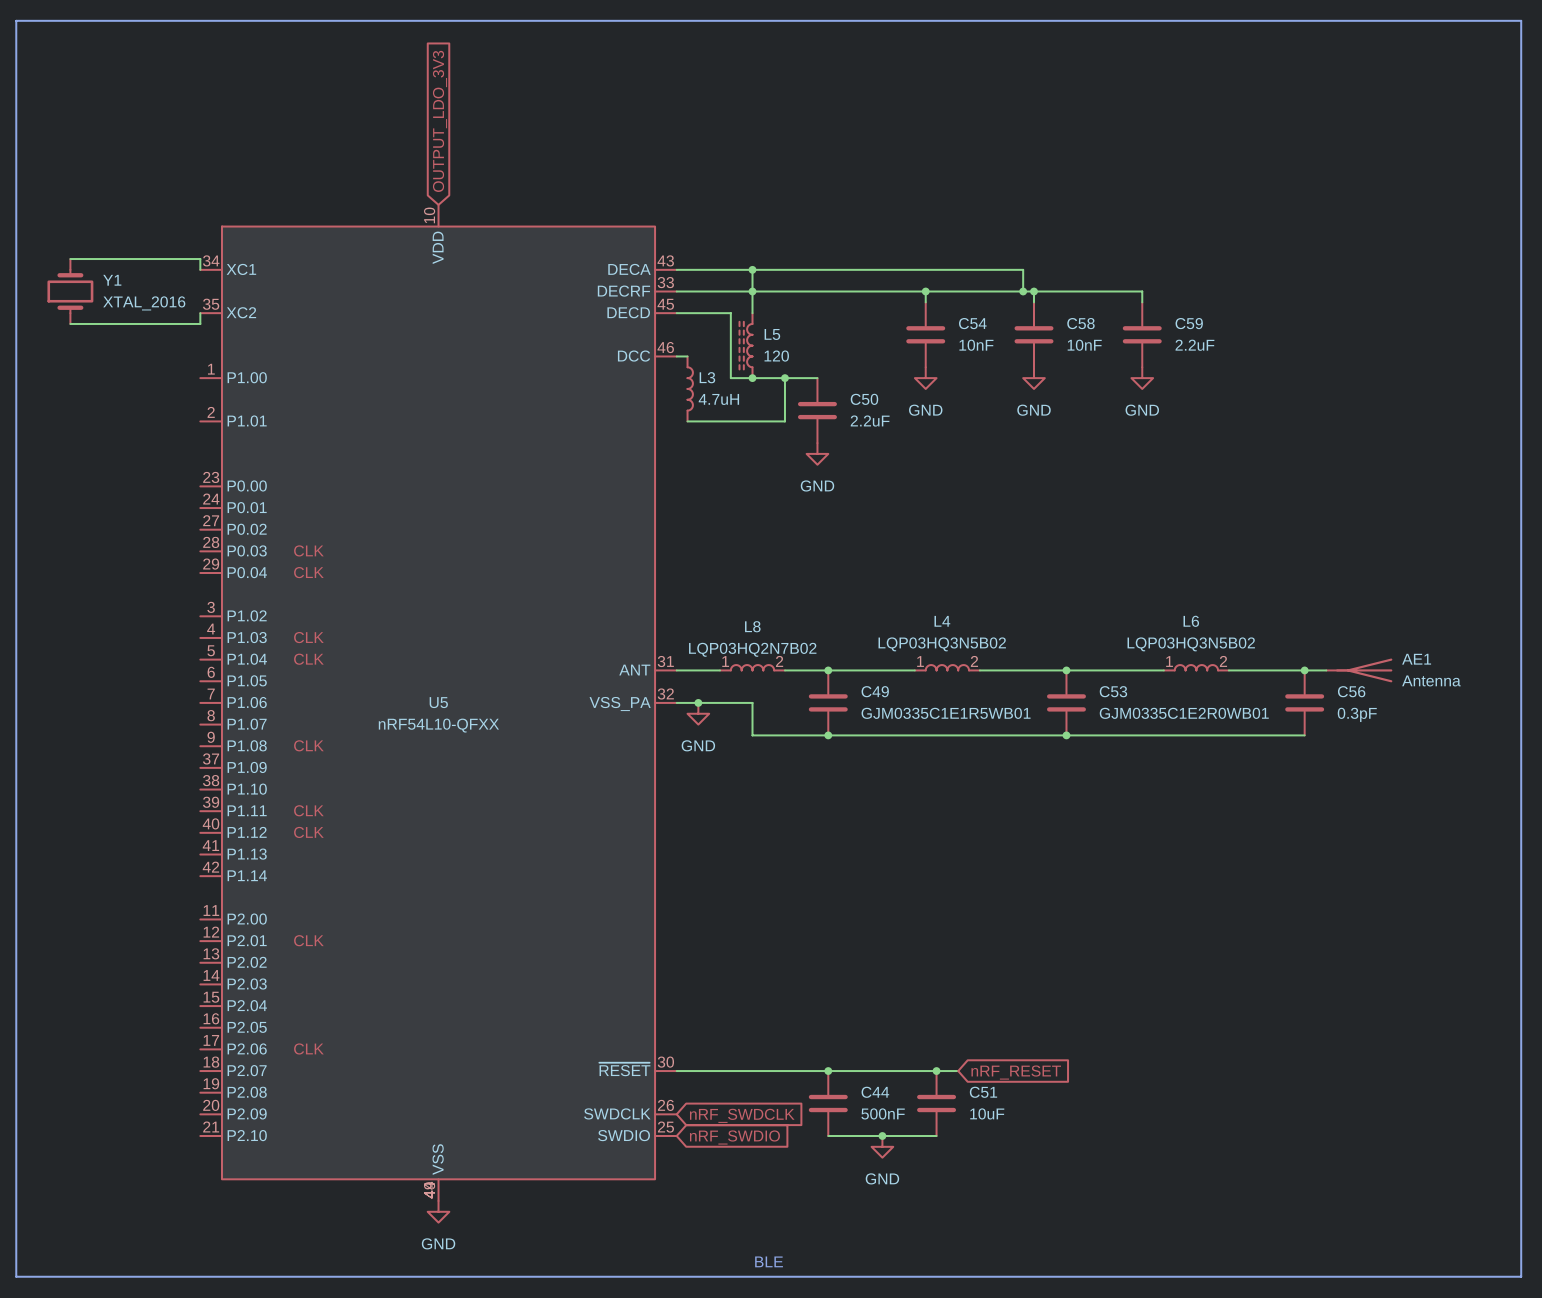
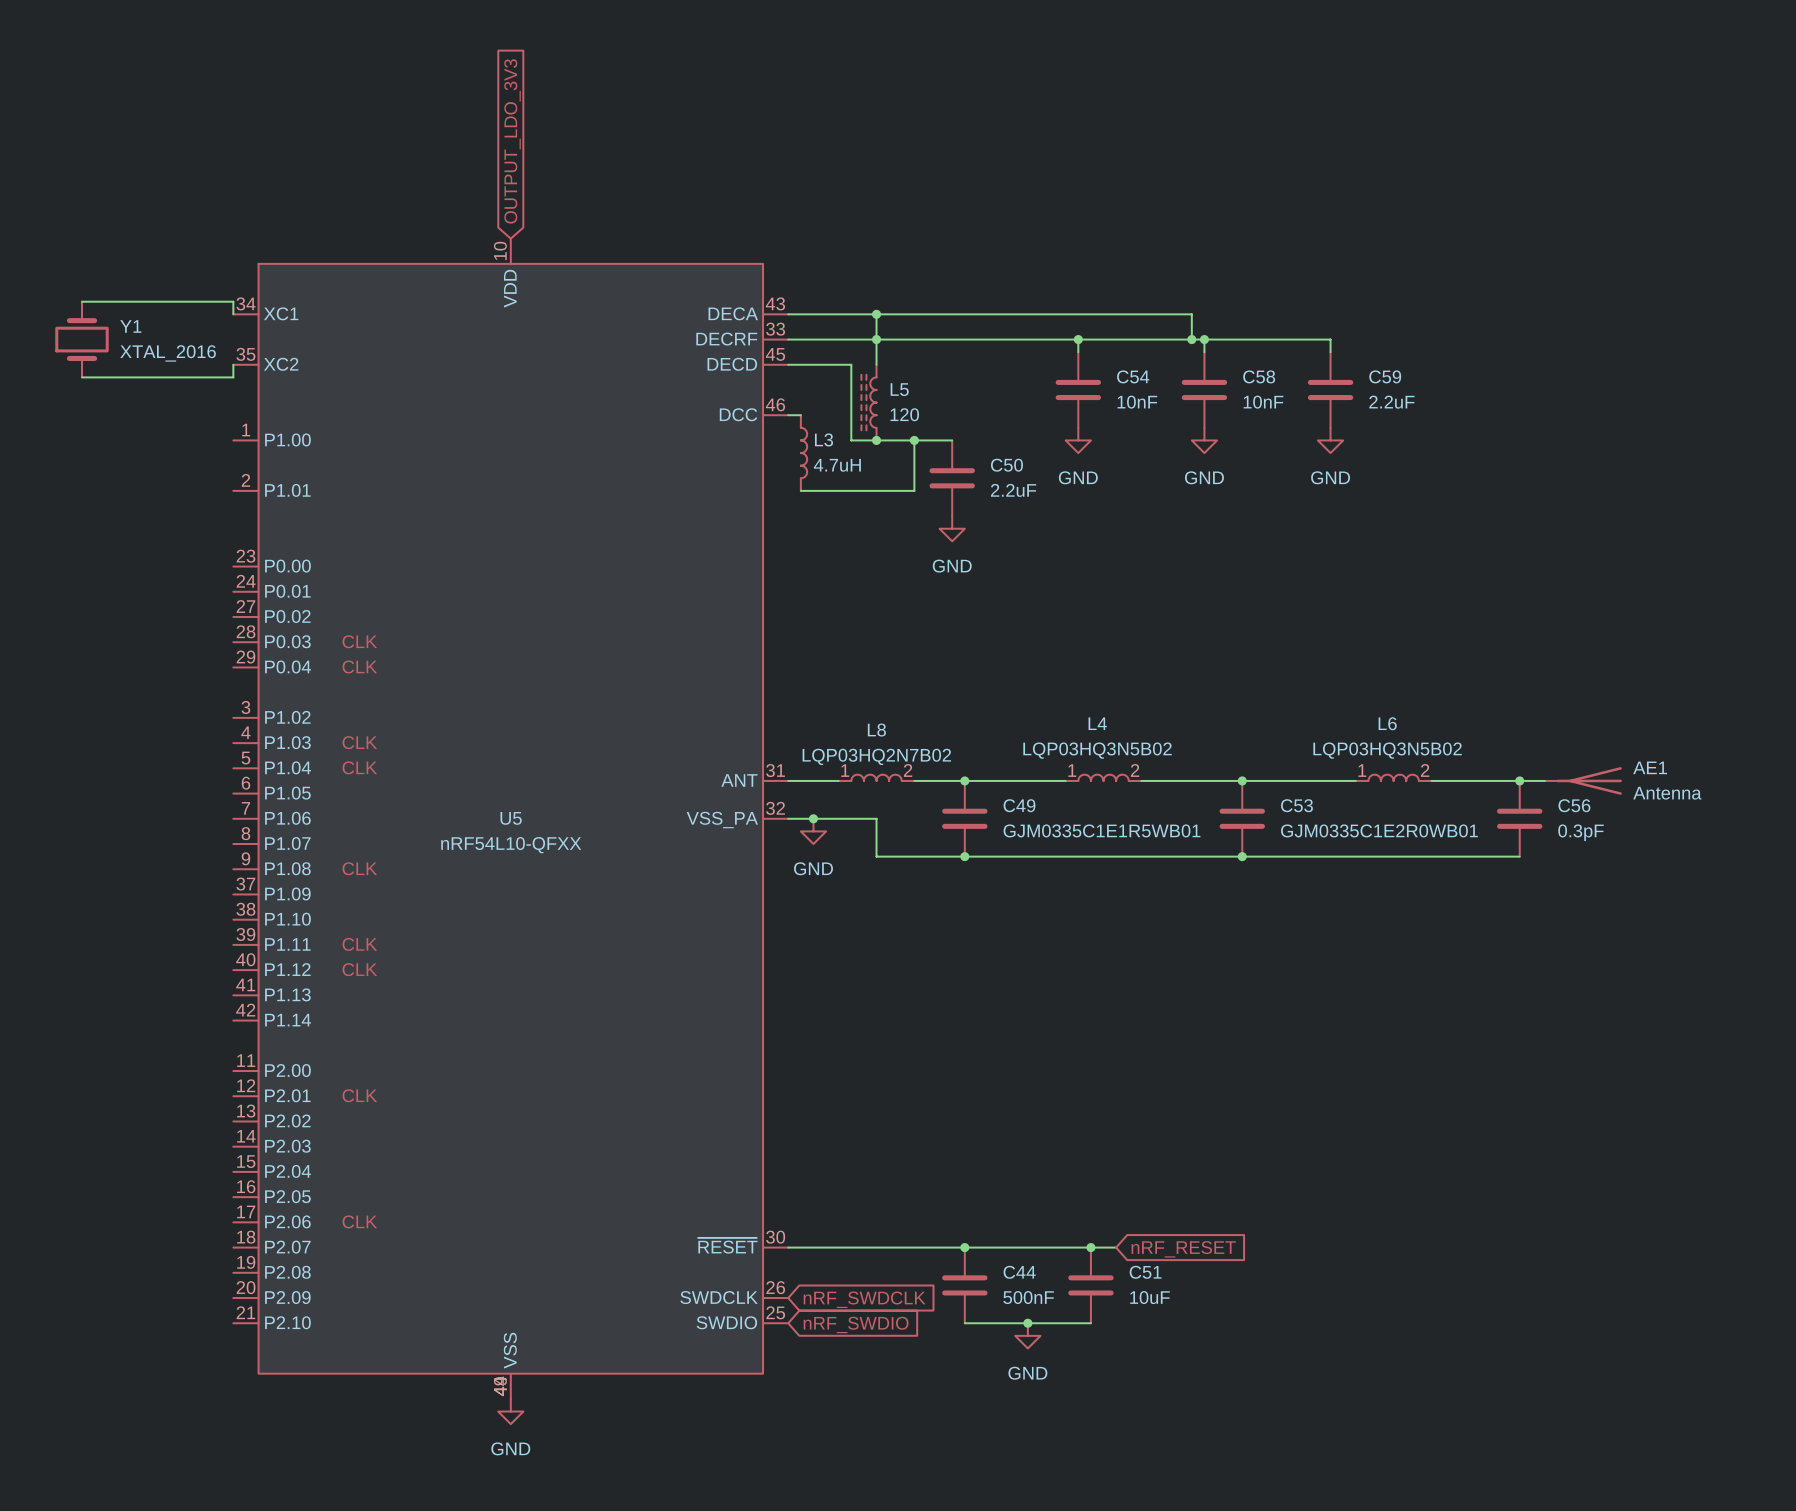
line: (16, 20) (1521, 20) (1521, 1276) (16, 1276) (16, 20) -> none
text: BLE (769, 1261) -> none

